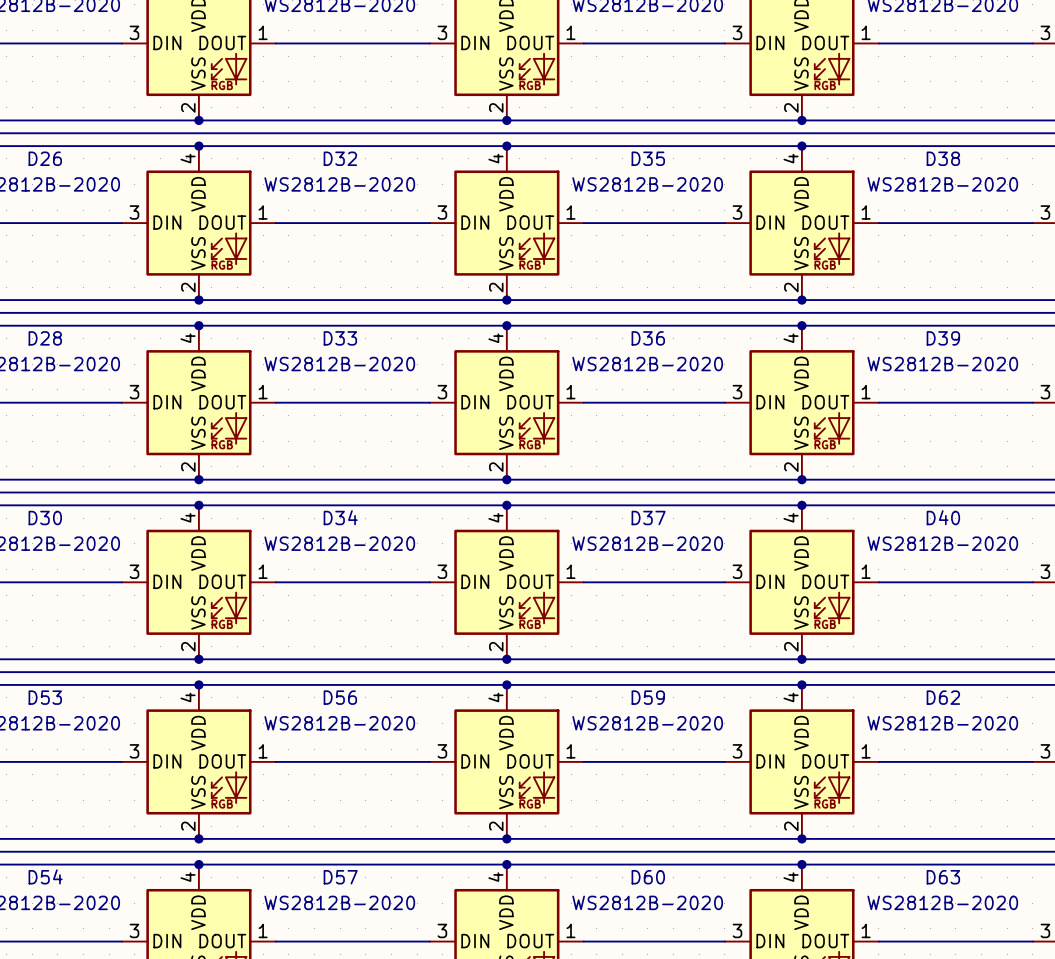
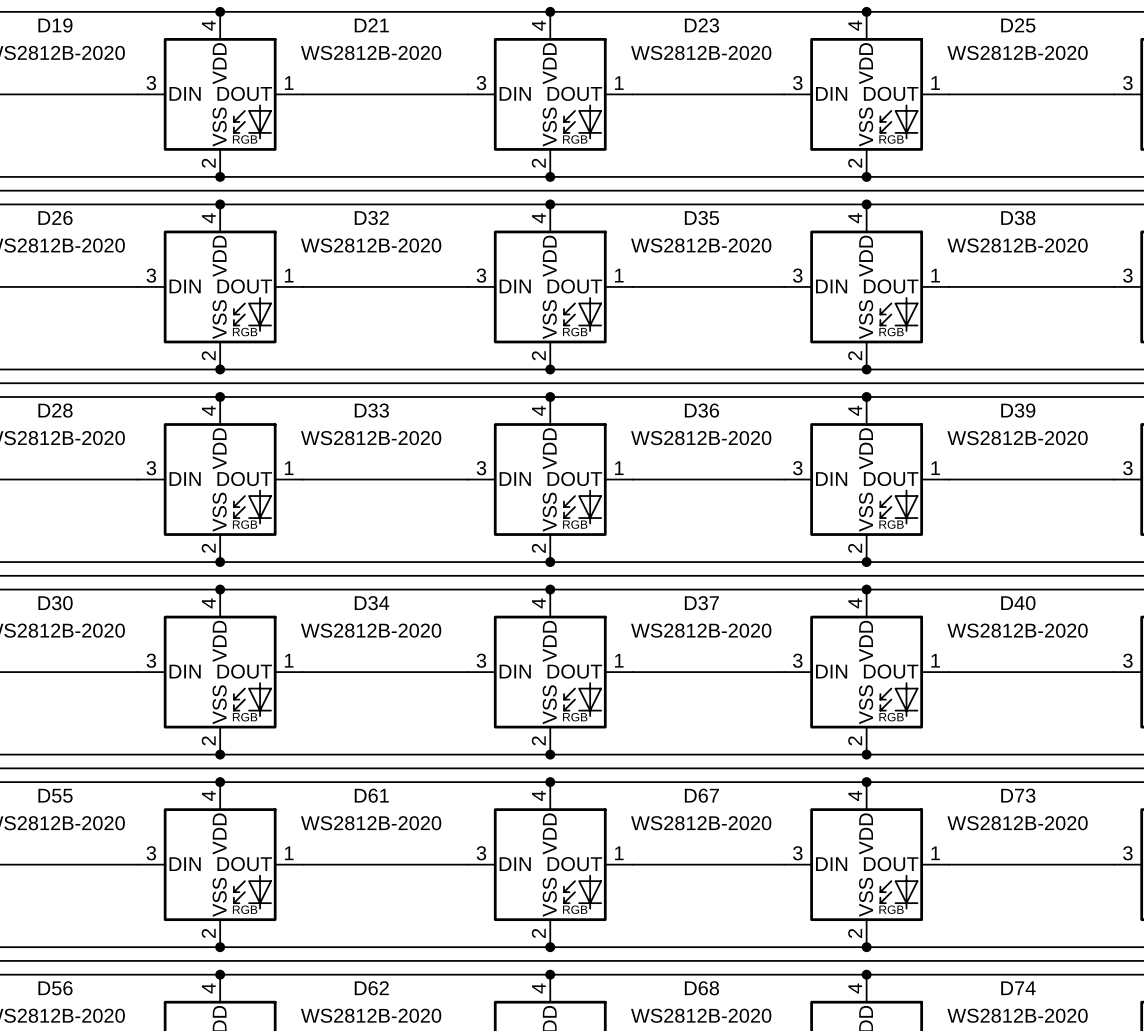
D53 name: D53 (45, 697) -> D55 (55, 795)
D56 name: D56 (340, 697) -> D61 (371, 795)
D59 name: D59 (648, 697) -> D67 (701, 795)
D62 name: D62 (943, 697) -> D73 (1018, 795)
D54 name: D54 (45, 876) -> D56 (55, 988)
D57 name: D57 (340, 877) -> D62 (371, 988)
D60 name: D60 (648, 877) -> D68 (701, 988)
D63 name: D63 (943, 877) -> D74 (1018, 988)

